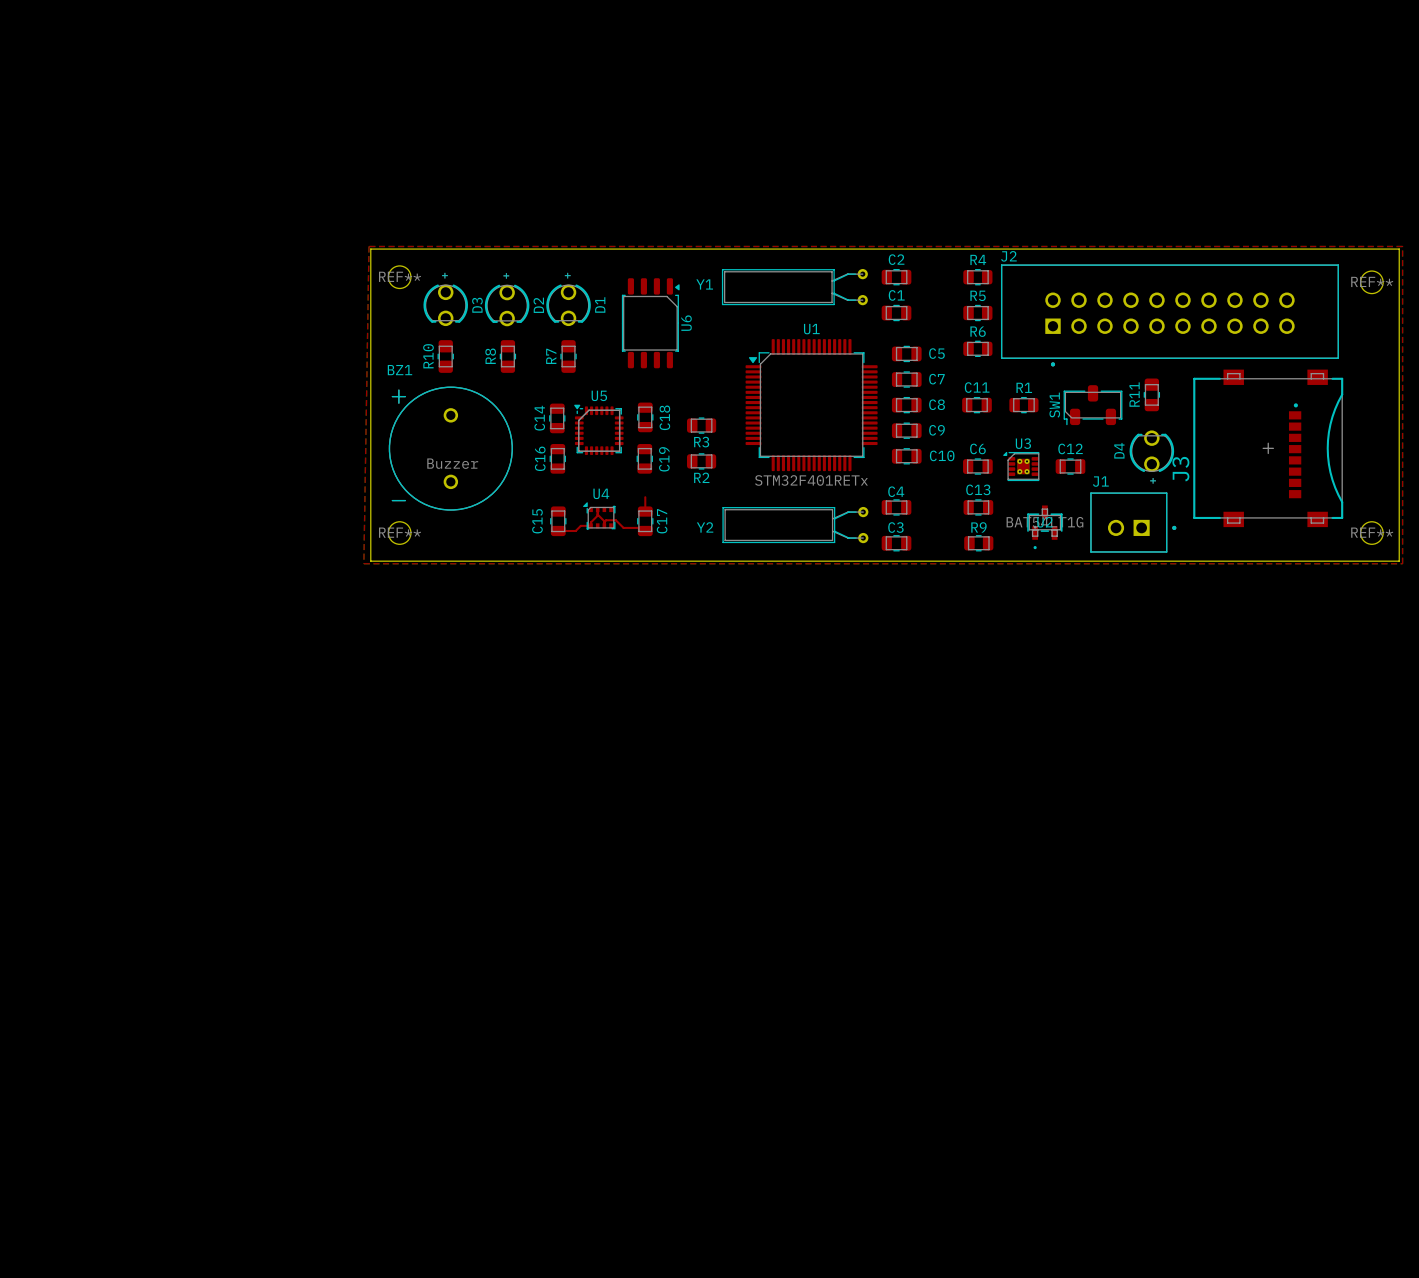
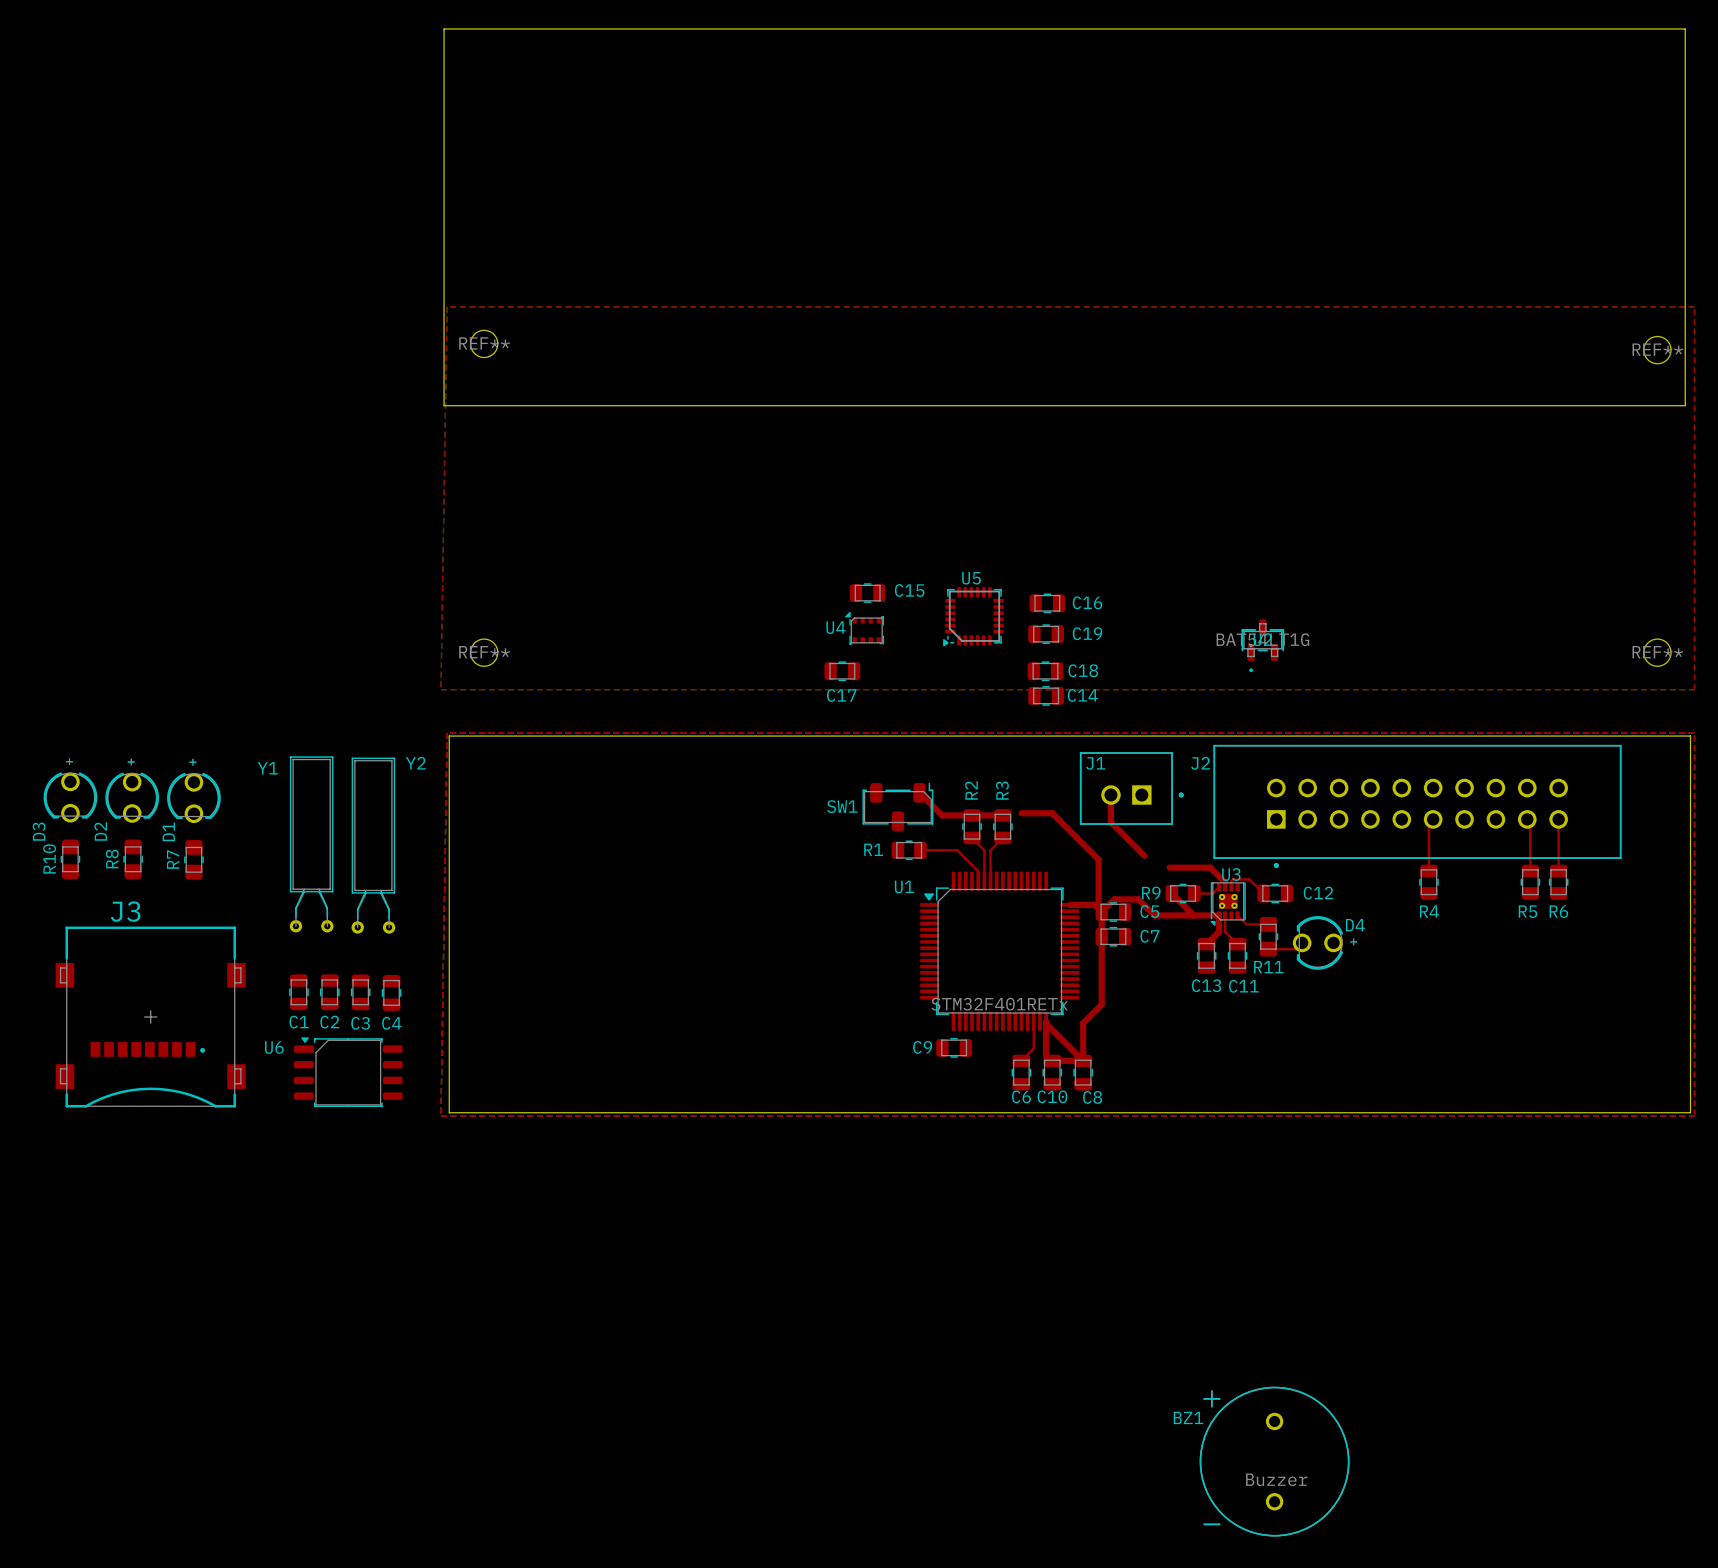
board edge: (370, 249) (1399, 249) (1399, 561) (370, 561) (370, 249) -> (444, 28) (1685, 28) (1685, 405) (444, 405) (444, 28)
J2 name position: J2 (1008, 256) -> J2 (1200, 763)
C2 name position: C2 (896, 259) -> C2 (329, 1022)
R4 name position: R4 (978, 259) -> R4 (1429, 911)
C2 rotation: 0° (896, 277) -> 90° clockwise (329, 992)
C2 position: (896, 277) -> (329, 992)
R4 rotation: 0° (977, 277) -> 90° clockwise (1428, 882)
R4 position: (977, 277) -> (1428, 882)
Y1 name position: Y1 (704, 284) -> Y1 (267, 768)
Y1 rotation: 0° (794, 287) -> 90° clockwise (311, 844)
Y1 position: (794, 287) -> (311, 844)
C1 name position: C1 (896, 295) -> C1 (299, 1022)
R5 name position: R5 (978, 295) -> R5 (1527, 911)
D1 name position: D1 (600, 304) -> D1 (168, 831)
D3 position: (445, 305) -> (70, 797)
D3 name position: D3 (477, 305) -> D3 (39, 831)
D2 position: (507, 305) -> (132, 797)
D2 name position: D2 (538, 305) -> D2 (100, 831)
D1 position: (568, 305) -> (193, 797)
C1 rotation: 0° (896, 313) -> 90° clockwise (298, 992)
C1 position: (896, 313) -> (298, 992)
R5 rotation: 0° (977, 313) -> 90° clockwise (1530, 882)
R5 position: (977, 313) -> (1530, 882)
J2 position: (1169, 315) -> (1417, 806)
U6 rotation: 0° (650, 323) -> 90° counterclockwise (348, 1072)
U6 position: (650, 323) -> (348, 1072)
U6 name position: U6 (686, 323) -> U6 (274, 1047)
U1 name position: U1 (811, 329) -> U1 (904, 886)
R6 name position: R6 (978, 331) -> R6 (1558, 911)
R6 rotation: 0° (977, 348) -> 90° clockwise (1558, 882)
R6 position: (977, 348) -> (1558, 882)
C5 position: (906, 353) -> (1113, 912)
R10 position: (445, 356) -> (70, 859)
R8 position: (507, 356) -> (133, 859)
R7 position: (568, 356) -> (193, 859)
BZ1 name position: BZ1 (399, 370) -> BZ1 (1188, 1417)
C7 position: (906, 379) -> (1113, 936)
C11 name position: C11 (977, 387) -> C11 (1243, 986)
R1 name position: R1 (1024, 387) -> R1 (873, 849)
R11 name rotation: 0° (1134, 394) -> 90° clockwise (1268, 967)
R11 position: (1151, 394) -> (1268, 936)
U1 position: (811, 405) -> (999, 951)
C8 rotation: 0° (906, 405) -> 90° clockwise (1083, 1072)
C8 position: (906, 405) -> (1083, 1072)
C11 rotation: 0° (976, 405) -> 90° clockwise (1237, 955)
C11 position: (976, 405) -> (1237, 955)
R1 position: (1023, 405) -> (909, 850)
SW1 rotation: 0° (1093, 405) -> 180° (897, 807)
SW1 position: (1093, 405) -> (897, 807)
C18 rotation: 0° (645, 417) -> 90° clockwise (1045, 671)
C18 position: (645, 417) -> (1045, 671)
C14 name position: C14 (539, 418) -> C14 (1082, 695)
C14 rotation: 0° (557, 418) -> 90° clockwise (1046, 695)
C14 position: (557, 418) -> (1046, 695)
R3 rotation: 0° (701, 425) -> 90° clockwise (1002, 826)
R3 position: (701, 425) -> (1002, 826)
U5 rotation: 0° (598, 429) -> 90° counterclockwise (973, 616)
U5 position: (598, 429) -> (973, 616)
C9 position: (906, 430) -> (954, 1047)
C9 name position: C9 (936, 430) -> C9 (922, 1047)
R3 name position: R3 (701, 442) -> R3 (1002, 790)
BZ1 position: (450, 448) -> (1274, 1461)
C6 name position: C6 (977, 448) -> C6 (1021, 1096)
C12 name position: C12 (1070, 448) -> C12 (1318, 893)
J3 rotation: 0° (1268, 448) -> 90° clockwise (150, 1017)
J3 position: (1268, 448) -> (150, 1017)
D4 name position: D4 (1119, 450) -> D4 (1355, 925)
D4 rotation: 0° (1151, 451) -> 90° counterclockwise (1317, 942)
D4 position: (1151, 451) -> (1317, 942)
C10 rotation: 0° (906, 456) -> 90° clockwise (1052, 1072)
C10 position: (906, 456) -> (1052, 1072)
C16 name position: C16 (540, 458) -> C16 (1087, 602)
C16 rotation: 0° (557, 458) -> 90° clockwise (1047, 603)
C16 position: (557, 458) -> (1047, 603)
C19 rotation: 0° (644, 458) -> 90° clockwise (1046, 634)
C19 position: (644, 458) -> (1046, 634)
R2 rotation: 0° (701, 461) -> 90° clockwise (972, 826)
R2 position: (701, 461) -> (972, 826)
C6 rotation: 0° (977, 466) -> 90° clockwise (1021, 1072)
C6 position: (977, 466) -> (1021, 1072)
U3 rotation: 0° (1021, 466) -> 90° counterclockwise (1228, 903)
U3 position: (1021, 466) -> (1228, 903)
C12 position: (1070, 466) -> (1275, 893)
R2 name position: R2 (701, 477) -> R2 (971, 790)
U1 value position: STM32F401RETx (811, 480) -> STM32F401RETx (999, 1004)
J1 name position: J1 (1100, 481) -> J1 (1095, 763)
C13 name position: C13 (978, 489) -> C13 (1206, 985)
C4 name position: C4 (896, 491) -> C4 (391, 1023)
U4 name position: U4 (601, 493) -> U4 (835, 627)
top track: (645, 497) (645, 511) -> none
C4 rotation: 0° (896, 507) -> 90° clockwise (391, 992)
C4 position: (896, 507) -> (391, 992)
C13 rotation: 0° (978, 507) -> 90° clockwise (1206, 955)
C13 position: (978, 507) -> (1206, 955)
top track: (597, 509) (597, 515) (591, 522) (591, 525) (580, 525) (575, 530) (558, 530) -> none
top track: (597, 514) (604, 521) (604, 525) -> none
U4 position: (599, 515) -> (864, 628)
C15 name position: C15 (537, 521) -> C15 (909, 590)
C15 rotation: 0° (558, 521) -> 90° clockwise (867, 593)
C15 position: (558, 521) -> (867, 593)
C17 rotation: 0° (645, 521) -> 90° clockwise (842, 671)
C17 position: (645, 521) -> (842, 671)
top track: (604, 522) (615, 520) (623, 527) (642, 527) (645, 530) -> none
J1 position: (1133, 522) -> (1131, 788)
Y2 rotation: 0° (795, 525) -> 90° clockwise (373, 845)
Y2 position: (795, 525) -> (373, 845)
Y2 name position: Y2 (705, 527) -> Y2 (415, 763)
C3 name position: C3 (895, 527) -> C3 (360, 1023)
R9 name position: R9 (978, 527) -> R9 (1151, 892)
C3 rotation: 0° (896, 543) -> 90° clockwise (360, 992)
C3 position: (896, 543) -> (360, 992)
R9 position: (978, 543) -> (1183, 893)
top zone outline: none -> (447, 732) (1694, 732) (1694, 1115) (440, 1115) (447, 732)
board edge: none -> (449, 736) (1690, 736) (1690, 1112) (449, 1112) (449, 736)
top track: none -> (919, 792) (942, 815) (1002, 815)
top track: none -> (1110, 795) (1110, 822) (1144, 855)
top track: none -> (1021, 813) (1052, 813) (1098, 859) (1098, 908)
top track: none -> (1433, 819) (1428, 823) (1428, 870)
top track: none -> (1527, 819) (1530, 822) (1530, 870)
top track: none -> (1558, 819) (1558, 870)
top track: none -> (972, 837) (984, 850) (984, 881)
top track: none -> (1002, 837) (990, 850) (990, 881)
top track: none -> (920, 850) (957, 850) (978, 871) (978, 881)
top track: none -> (1169, 867) (1210, 867) (1225, 882) (1225, 887)
top track: none -> (1219, 887) (1212, 893) (1194, 893)
top track: none -> (1231, 887) (1233, 879) (1249, 879) (1263, 893)
top track: none -> (1171, 893) (1193, 915)
top track: none -> (1069, 904) (1094, 904) (1101, 912)
top track: none -> (1101, 912) (1101, 1004) (1083, 1023) (1083, 1060)
top track: none -> (1101, 912) (1114, 899) (1138, 899) (1154, 915) (1219, 915) (1219, 931) (1206, 944)
top track: none -> (1225, 915) (1225, 931) (1237, 944)
top track: none -> (1237, 915) (1246, 924) (1268, 924)
top track: none -> (1302, 942) (1295, 949) (1268, 949)
top track: none -> (1033, 1021) (1033, 1048) (1021, 1060)
top track: none -> (1083, 1060) (1052, 1060) (1046, 1054) (1046, 1021) (1046, 1023) (1083, 1060)

